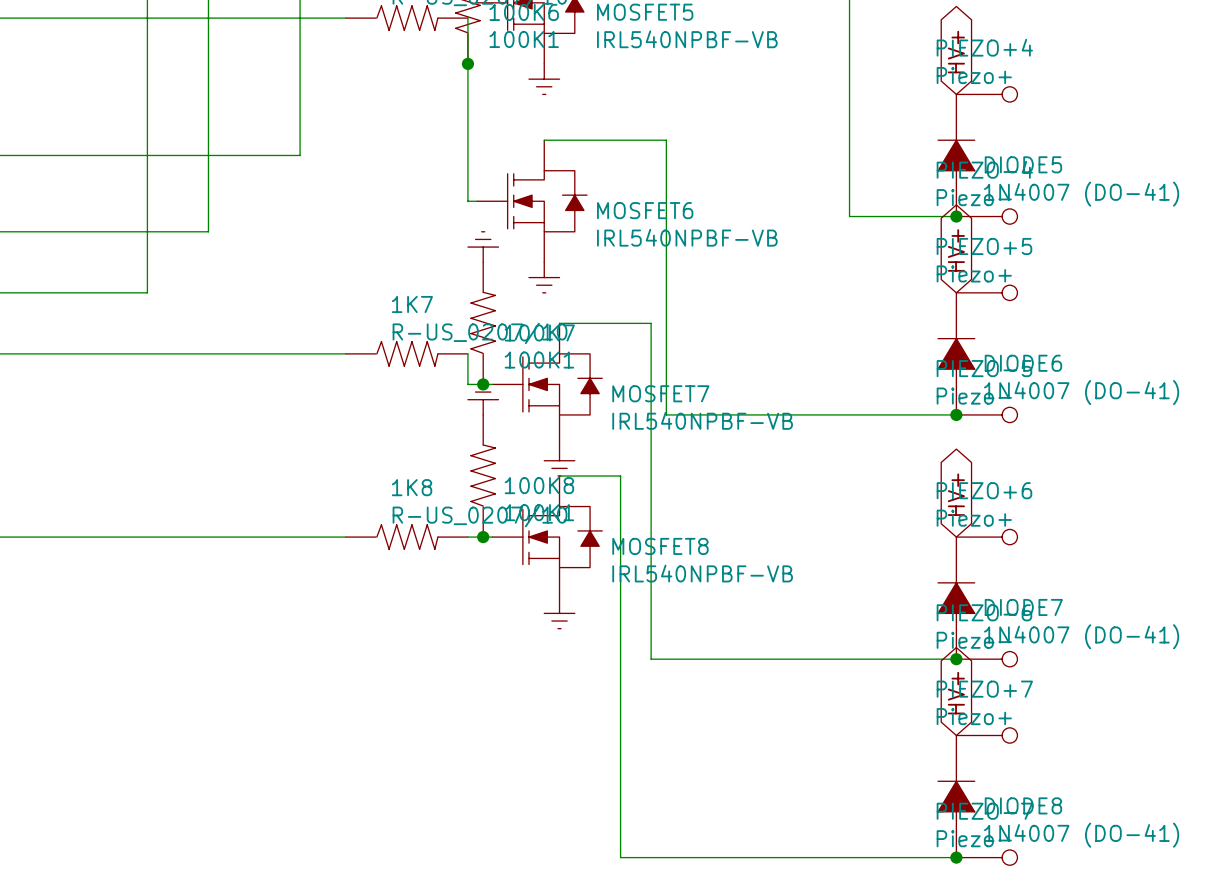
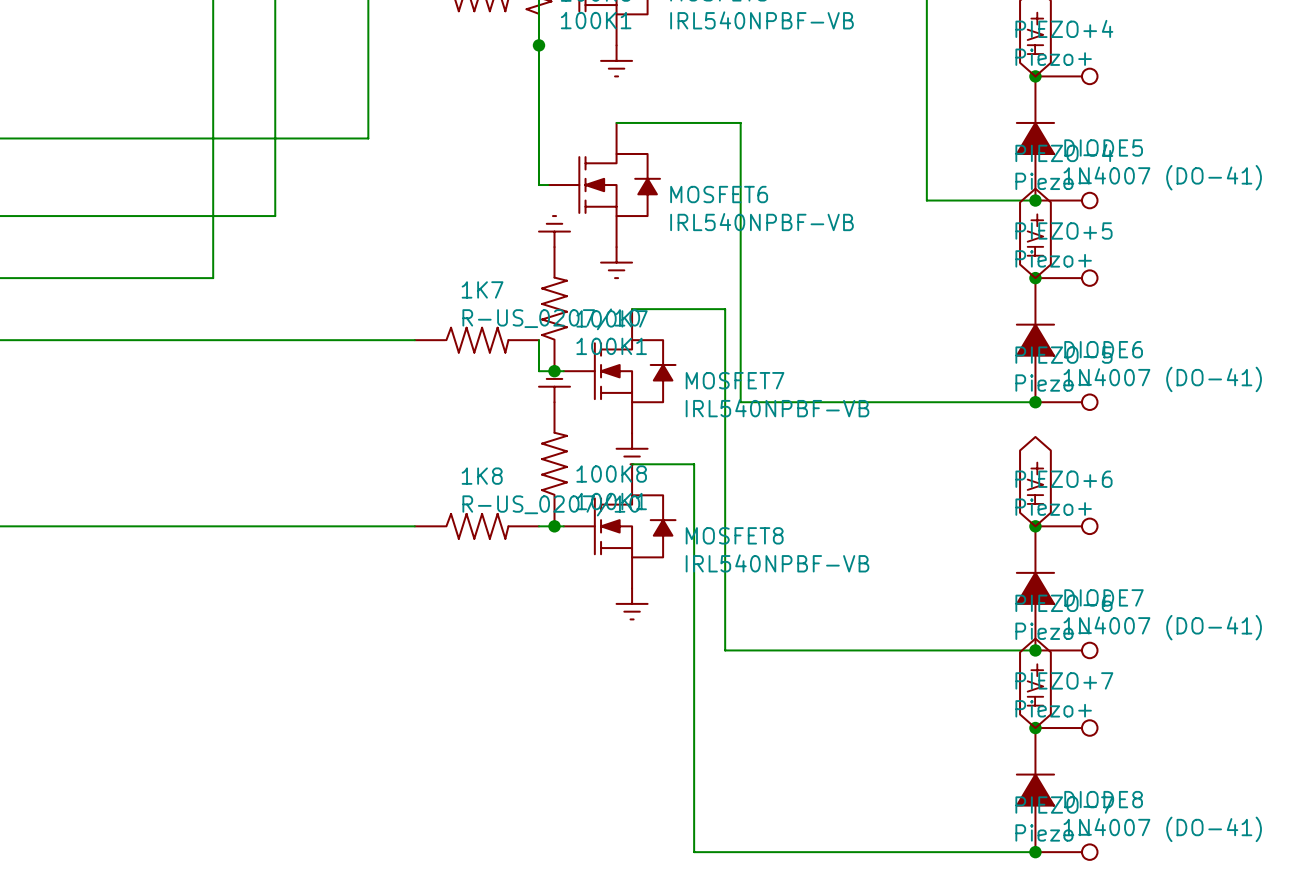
junction: none -> (1035, 76)
junction: none -> (1035, 278)
junction: none -> (1035, 526)
junction: none -> (1035, 728)

